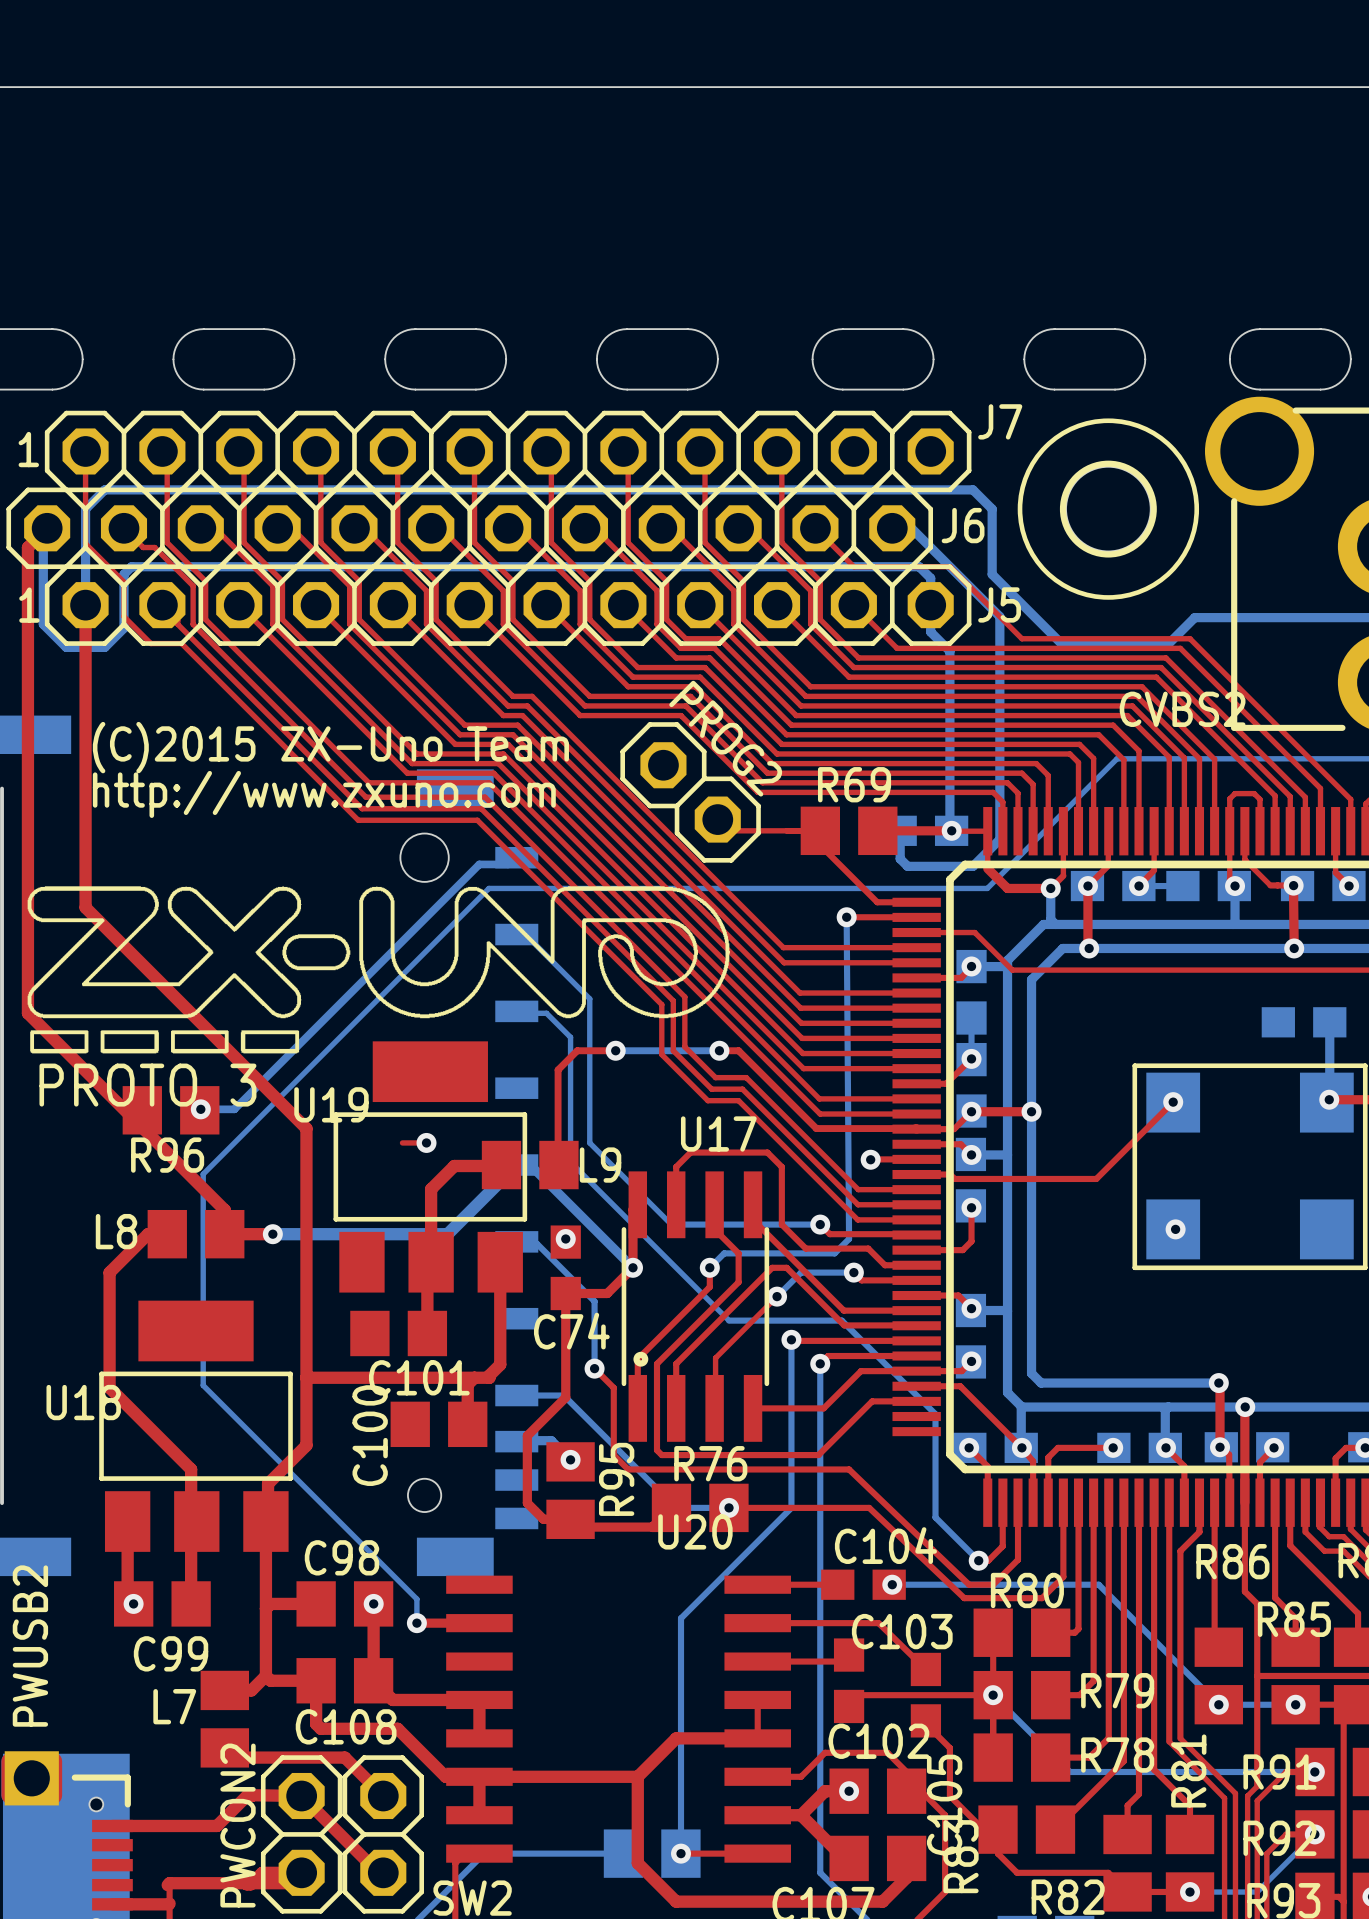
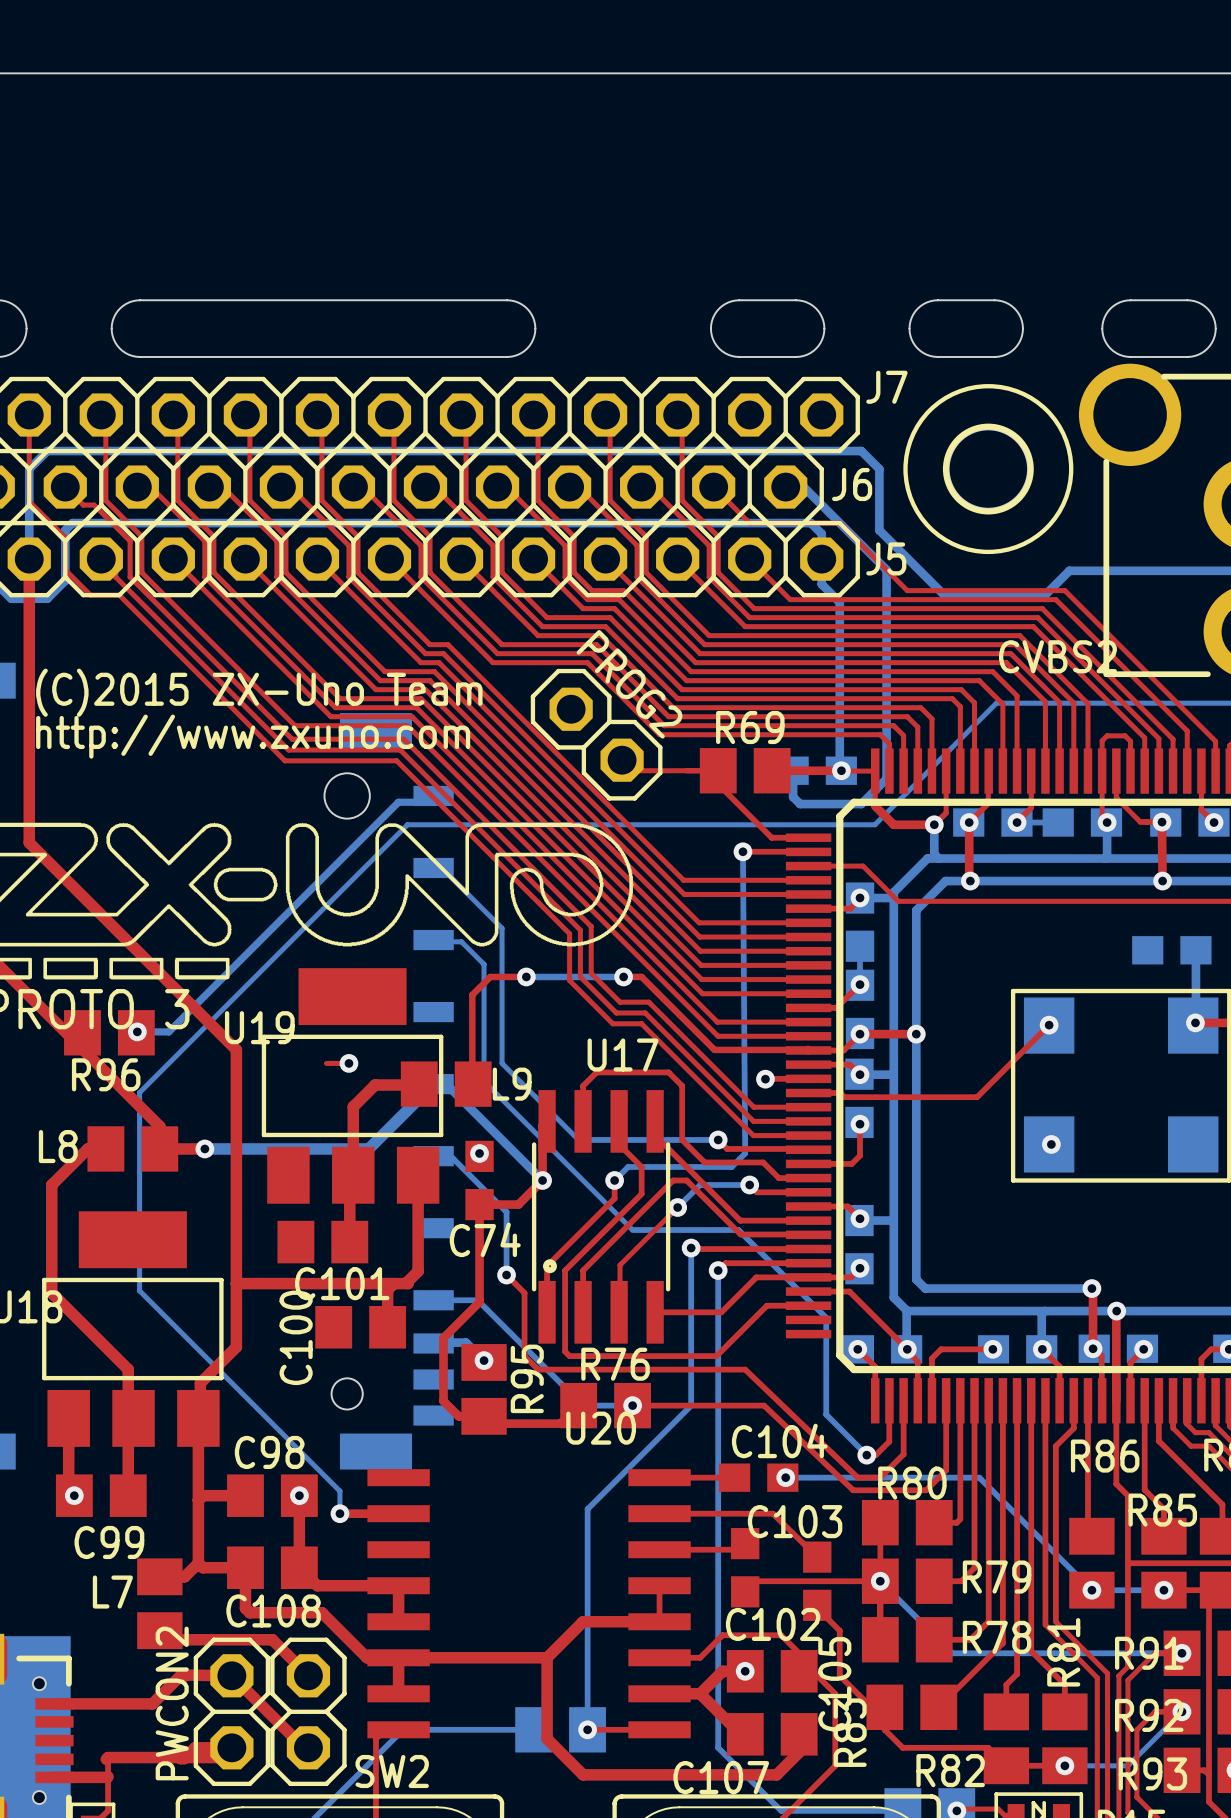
board edge: (264, 329) (275, 331) (285, 337) (292, 347) (294, 359) (292, 370) (285, 380) (275, 387) (264, 389) -> (196, 300) (338, 300)
board edge: (415, 329) (403, 331) (394, 337) (387, 347) (385, 359) (387, 370) (394, 380) (403, 387) (415, 389) -> (196, 356) (338, 356)
board edge: (475, 329) (487, 331) (497, 337) (503, 347) (506, 359) (503, 370) (497, 380) (487, 387) (475, 389) -> (395, 300) (514, 301) (529, 311) (535, 328) (529, 345) (514, 356) (395, 356)
board edge: (627, 329) (687, 329) (702, 333) (711, 340) (716, 351) (717, 363) (713, 374) (706, 383) (691, 389) (627, 389) (612, 385) (605, 380) (599, 370) (597, 363) (597, 351) (600, 344) (608, 335) (615, 331) (627, 329) -> none

